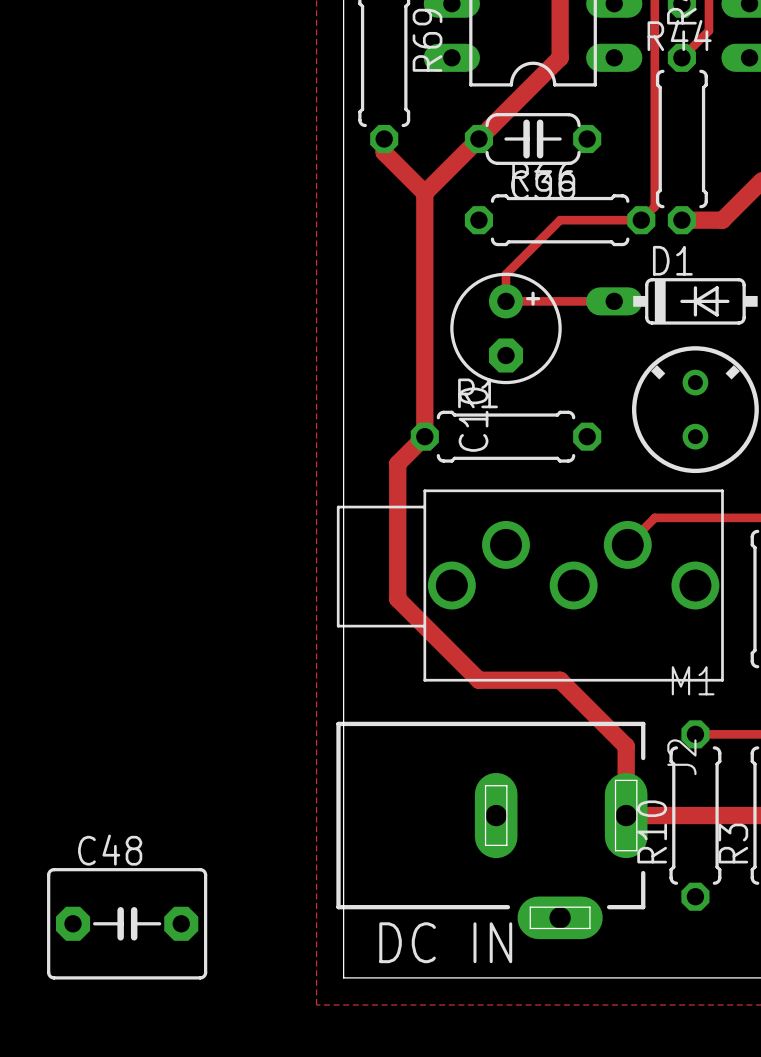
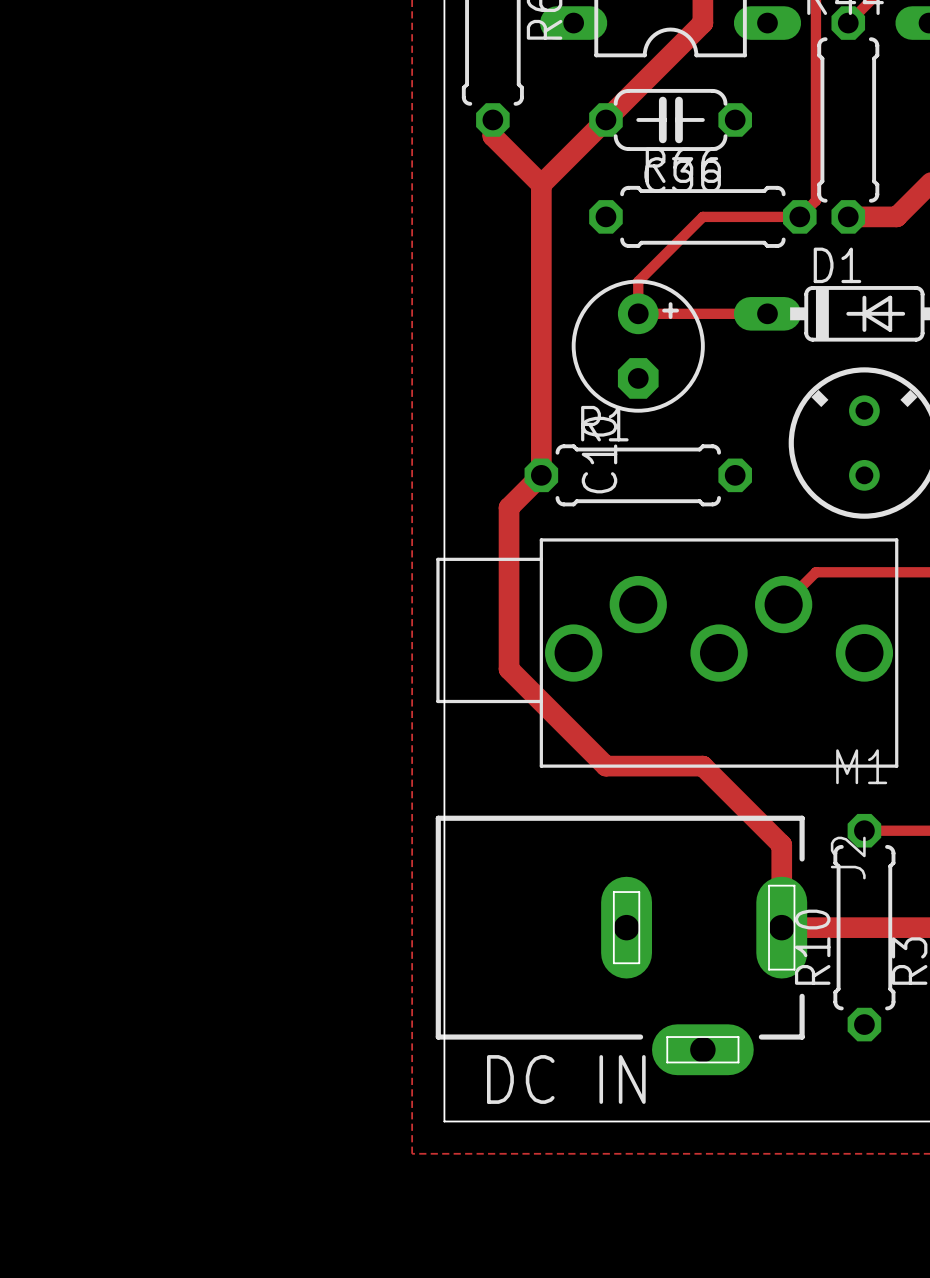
C48: (127, 923) -> none

